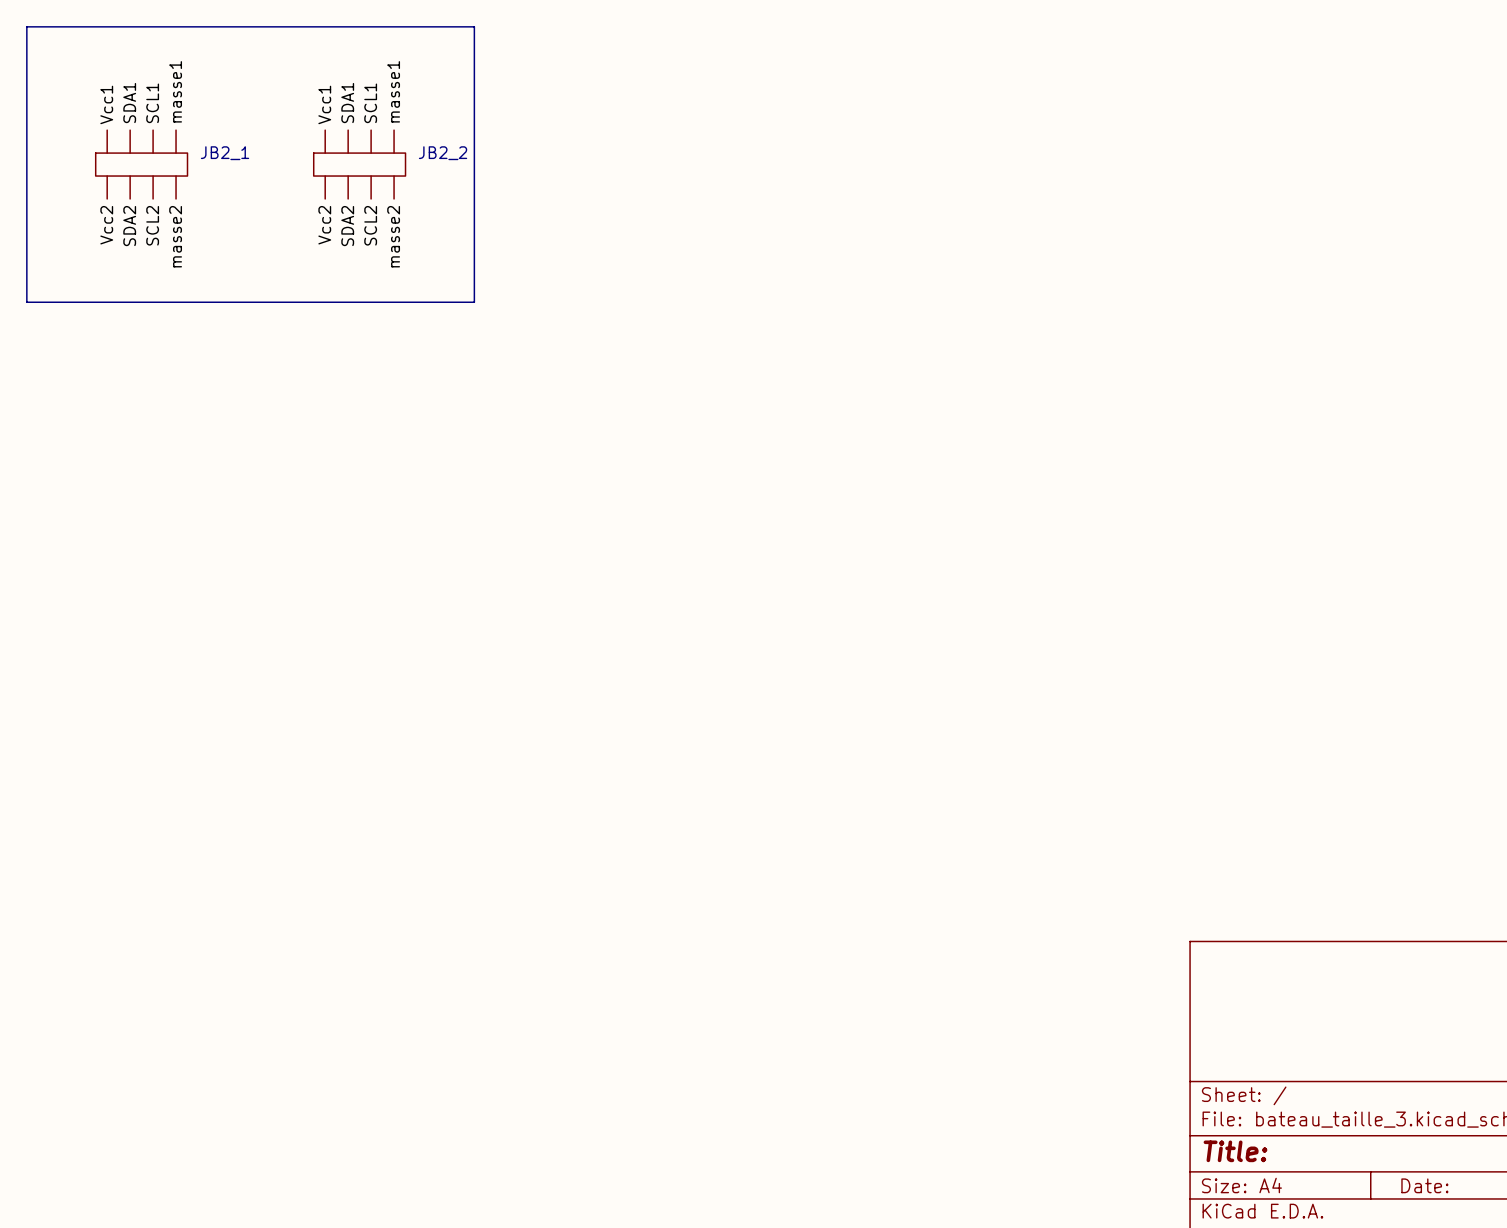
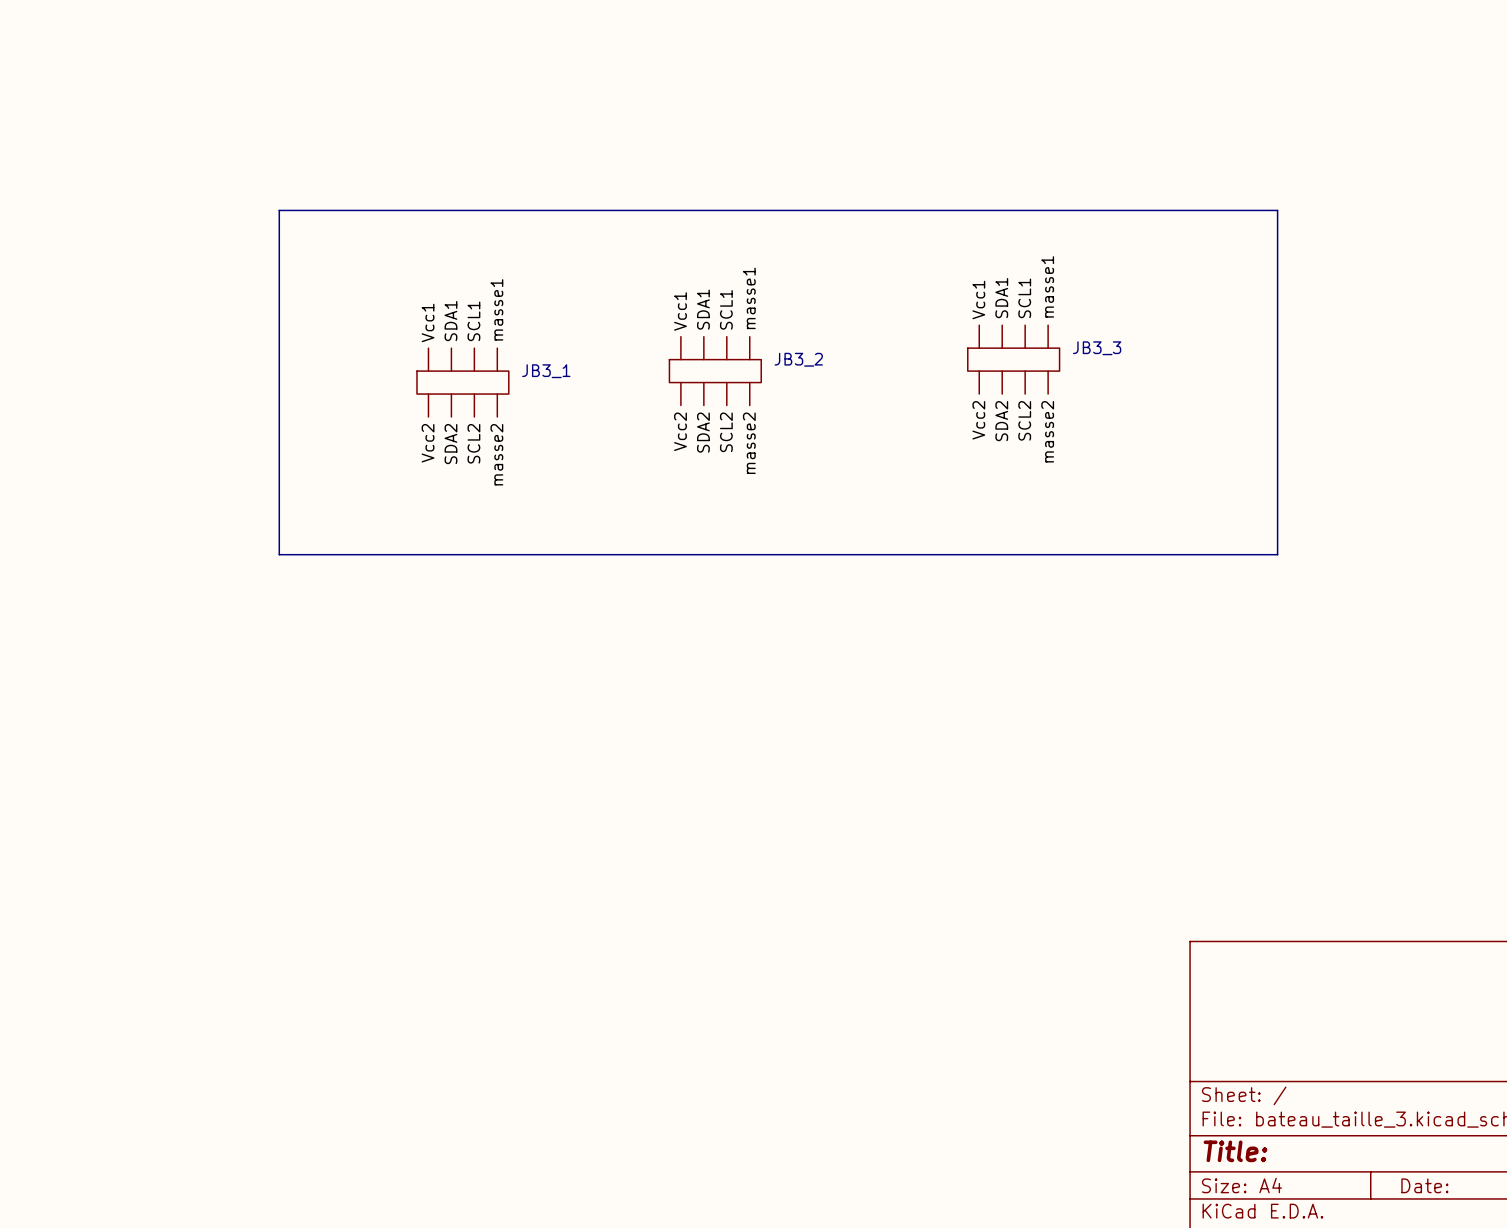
line: (26, 26) (474, 26) (474, 302) (26, 302) (26, 26) -> none
JB2_1: (141, 164) -> none
JB2_2: (359, 164) -> none
line: none -> (279, 210) (1277, 210) (1277, 554) (279, 554) (279, 210)
JB3_3: none -> (1013, 359)
JB3_2: none -> (715, 371)
JB3_1: none -> (462, 382)

